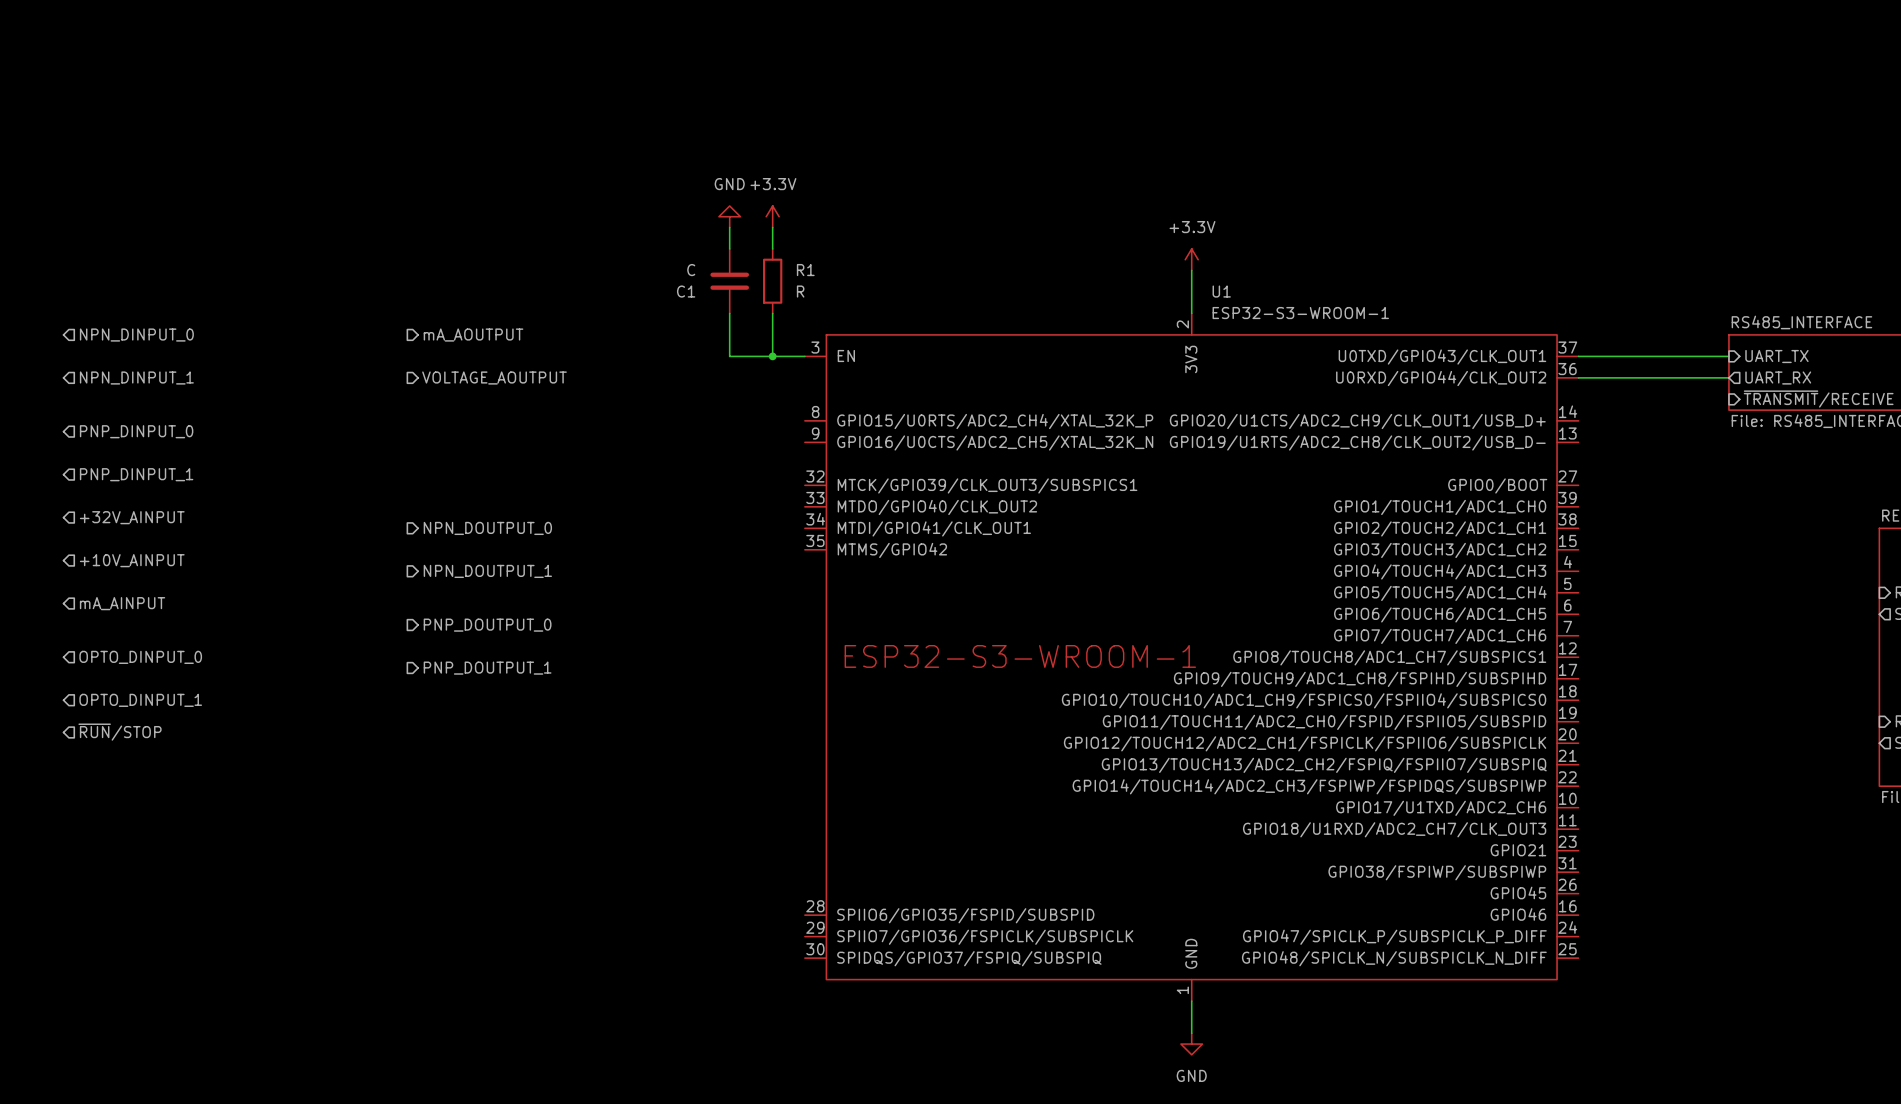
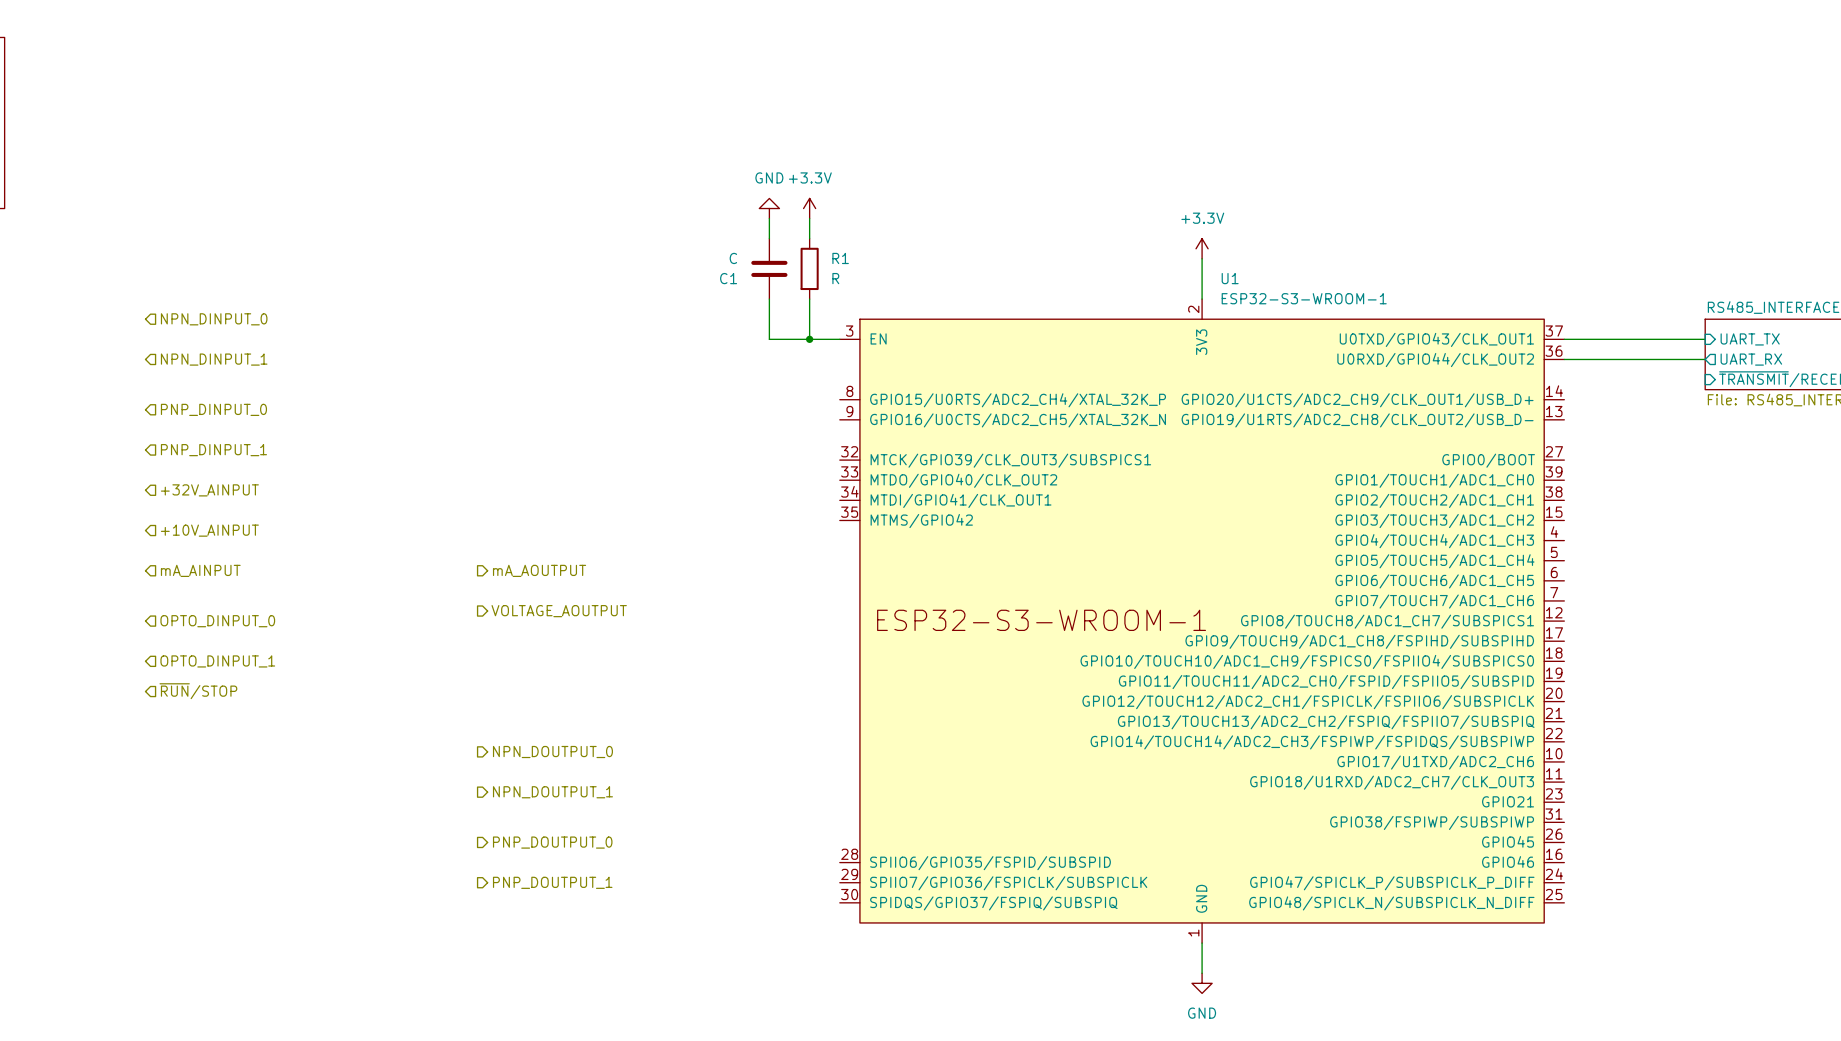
hierarchical label: mA_AOUTPUT (473, 335) -> none
hierarchical label: VOLTAGE_AOUTPUT (494, 378) -> none
hierarchical label: NPN_DOUTPUT_0 (487, 528) -> none
hierarchical label: NPN_DOUTPUT_1 (487, 571) -> none
hierarchical label: PNP_DOUTPUT_0 (487, 625) -> mA_AOUTPUT (539, 570)
hierarchical label: none -> VOLTAGE_AOUTPUT (559, 611)
hierarchical label: PNP_DOUTPUT_1 (487, 668) -> none
hierarchical label: none -> NPN_DOUTPUT_0 (552, 752)
hierarchical label: none -> NPN_DOUTPUT_1 (552, 792)
hierarchical label: none -> PNP_DOUTPUT_0 (552, 842)
hierarchical label: none -> PNP_DOUTPUT_1 (552, 882)

